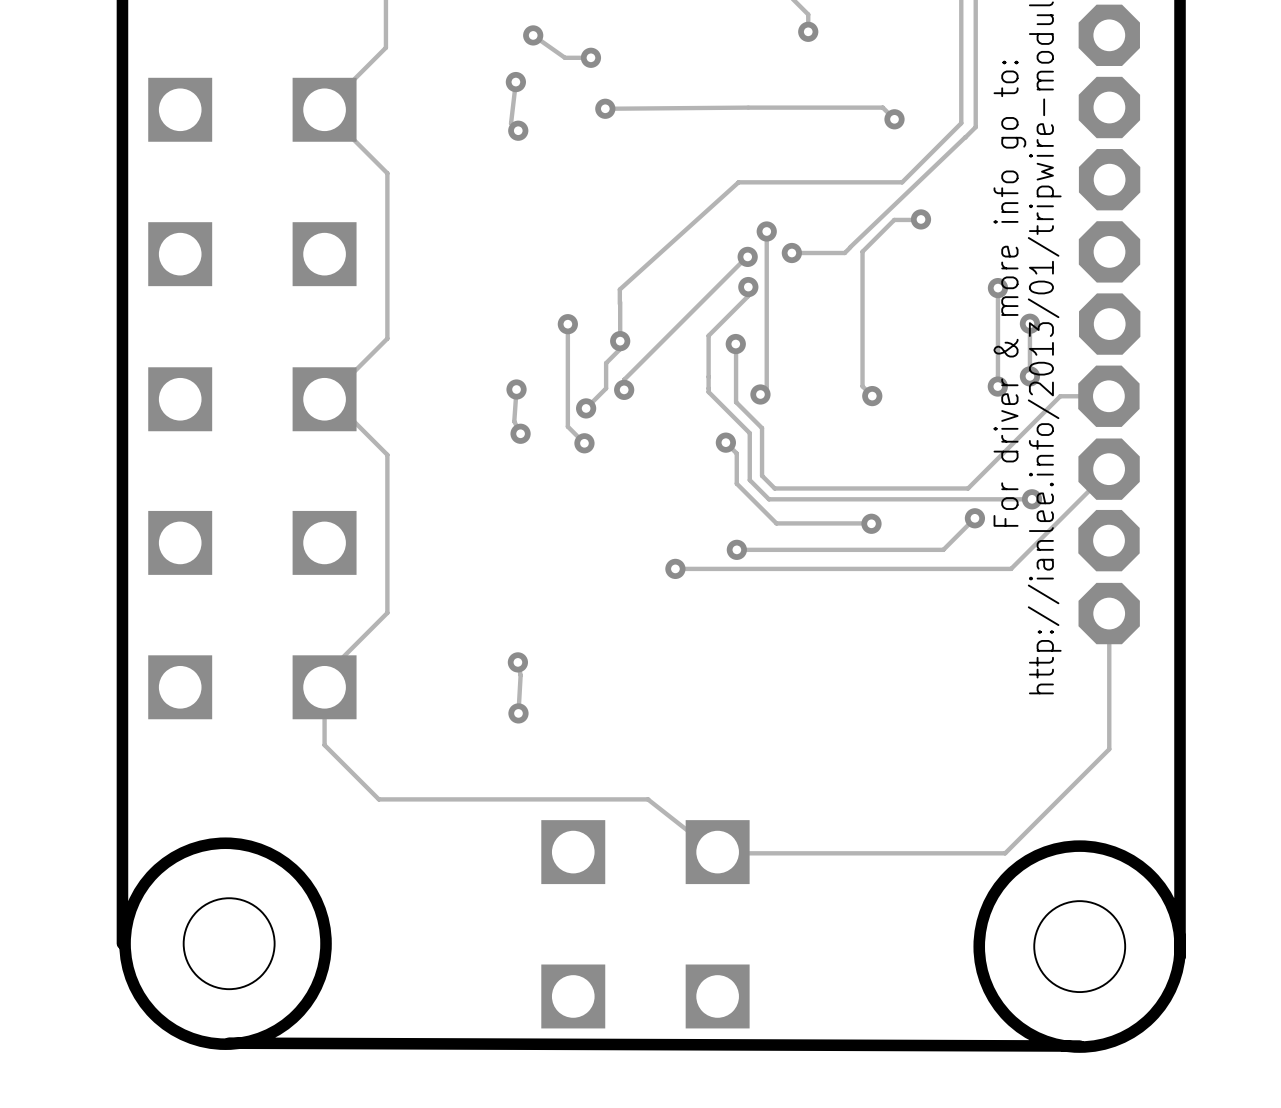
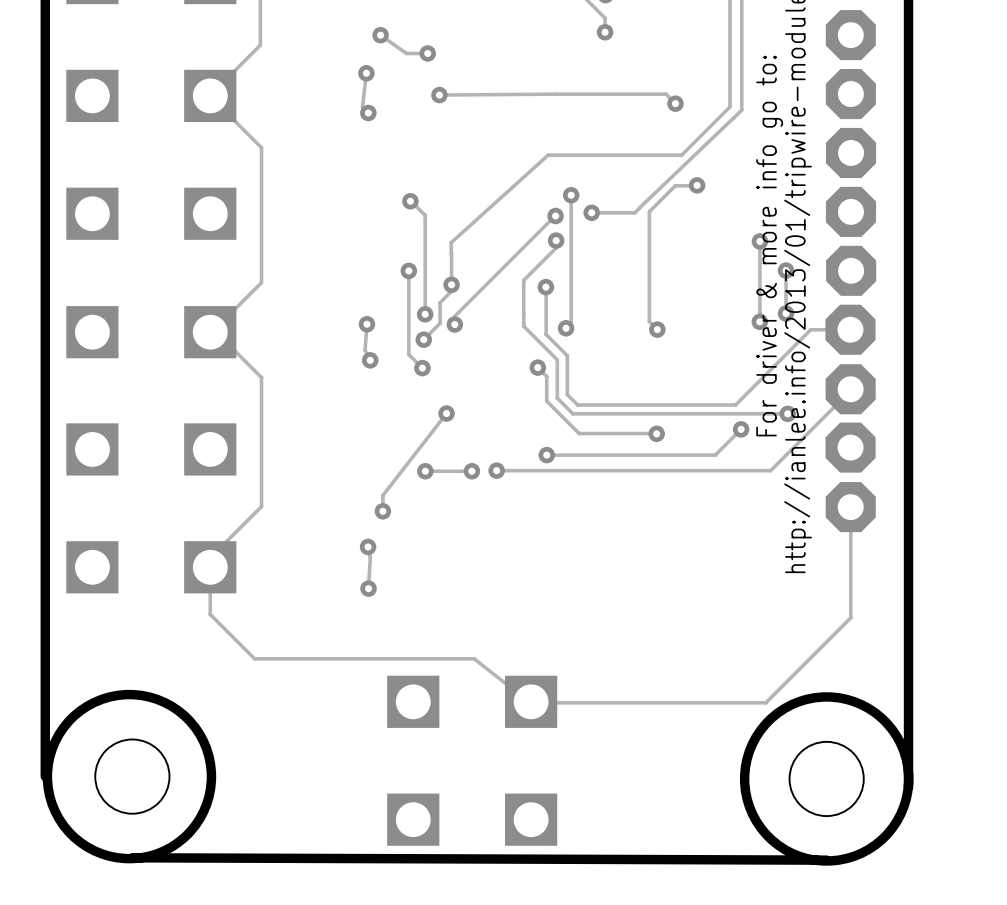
via: none -> (410, 201)
track: none -> (410, 200) (425, 215) (425, 314)
via: none -> (425, 314)
track: none -> (446, 413) (382, 495) (382, 511)
via: none -> (446, 413)
via: none -> (425, 471)
track: none -> (471, 471) (425, 471)
via: none -> (471, 471)
via: none -> (382, 511)

